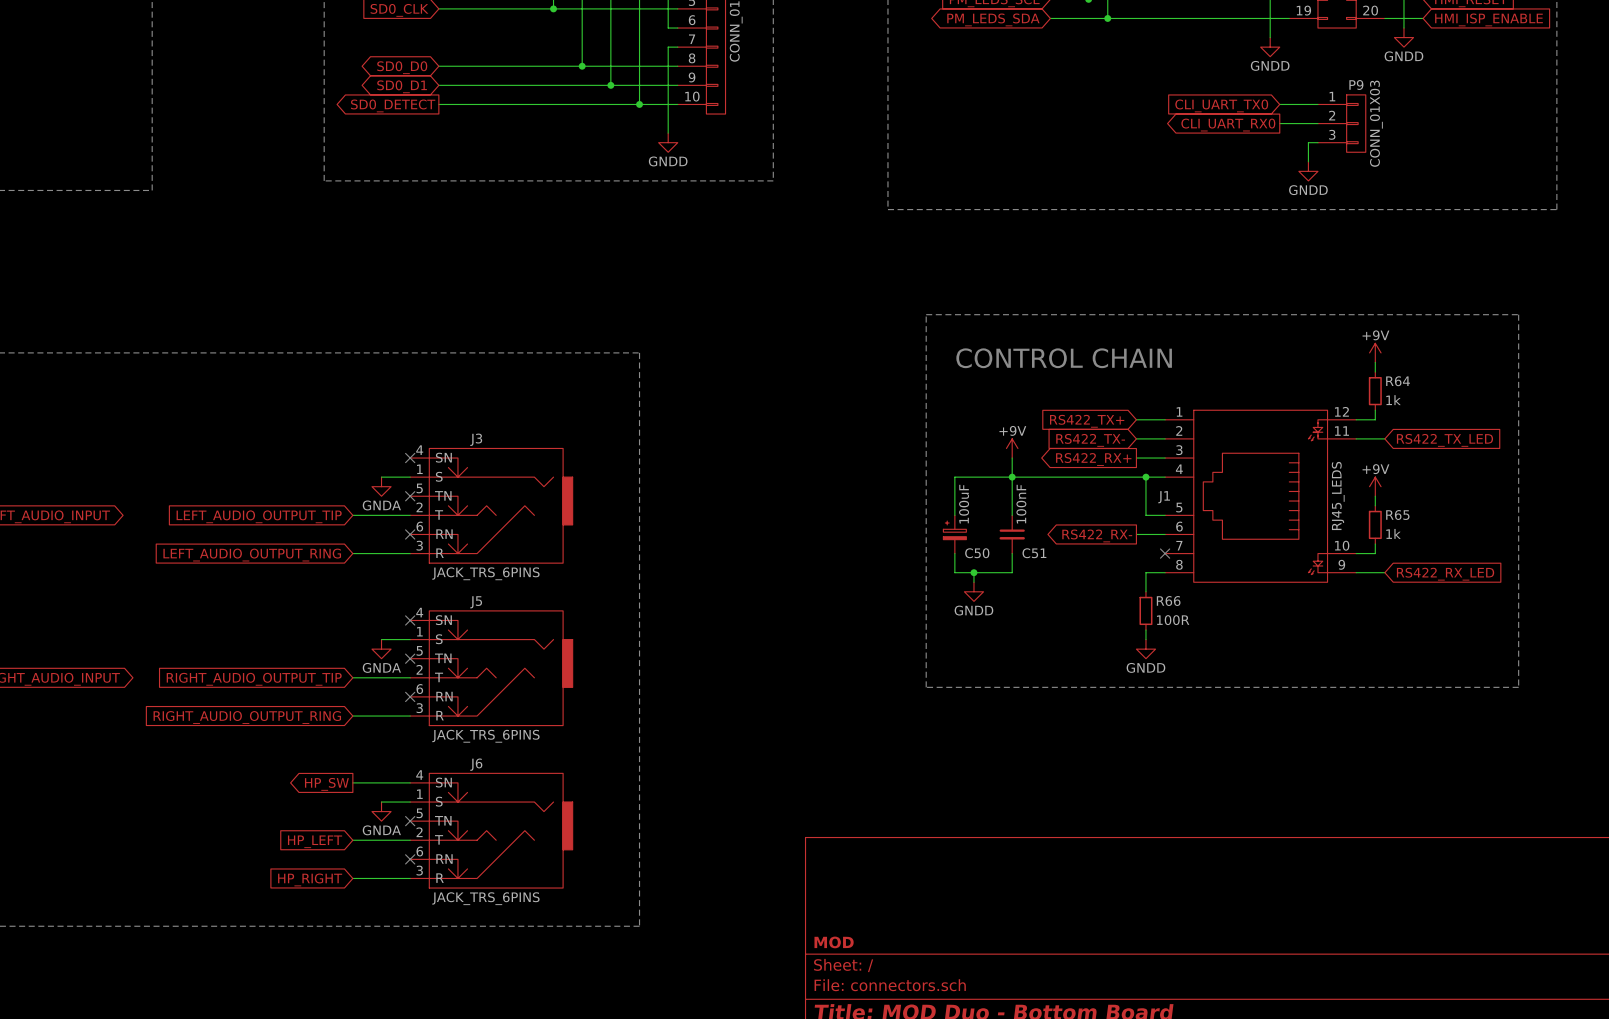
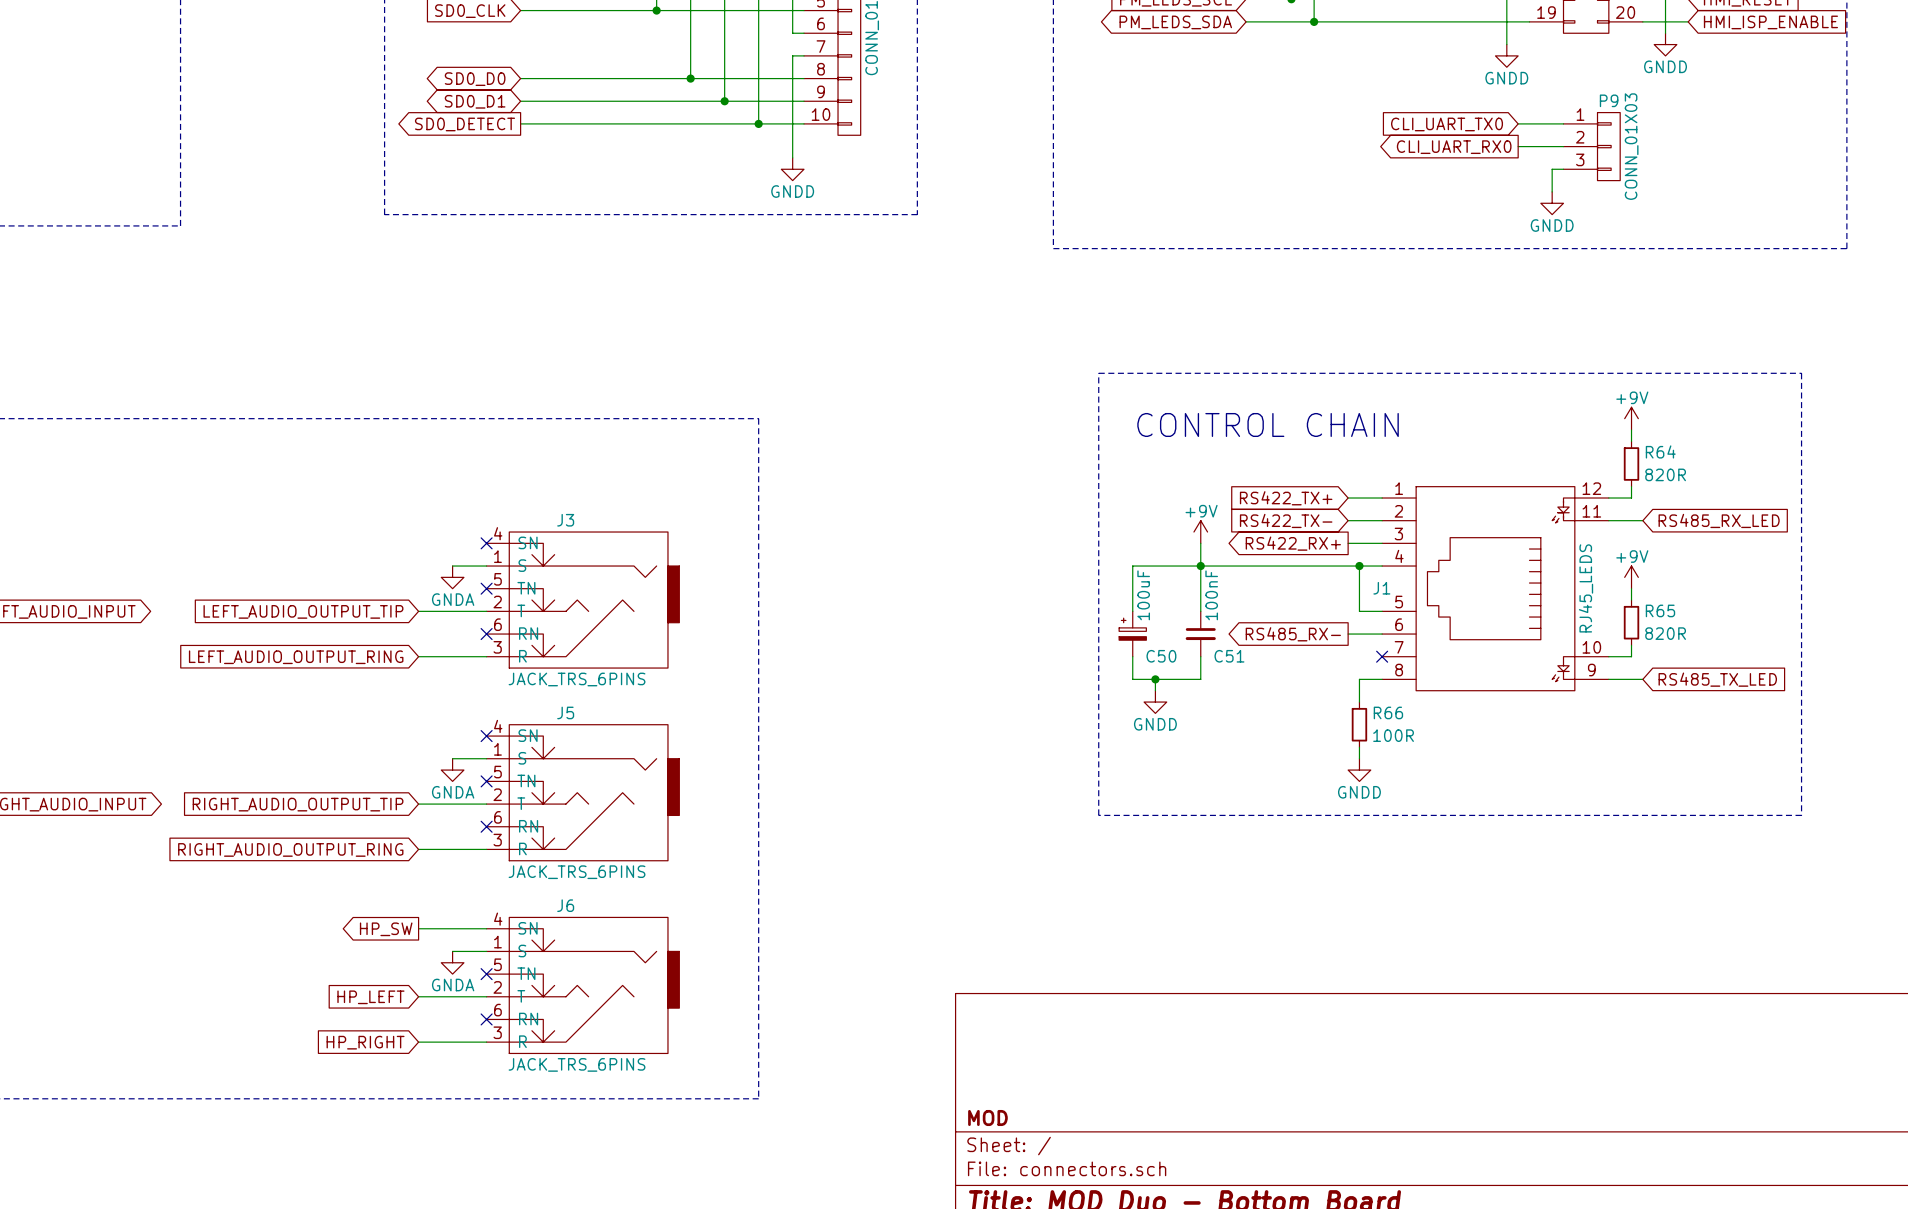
R64 value: 1k (1393, 400) -> 820R (1665, 474)
global label: RS422_TX_LED (1444, 440) -> RS485_RX_LED (1719, 520)
R65 value: 1k (1393, 533) -> 820R (1665, 633)
global label: RS422_RX- (1097, 535) -> RS485_RX- (1293, 634)
global label: RS422_RX_LED (1445, 574) -> RS485_TX_LED (1717, 679)

